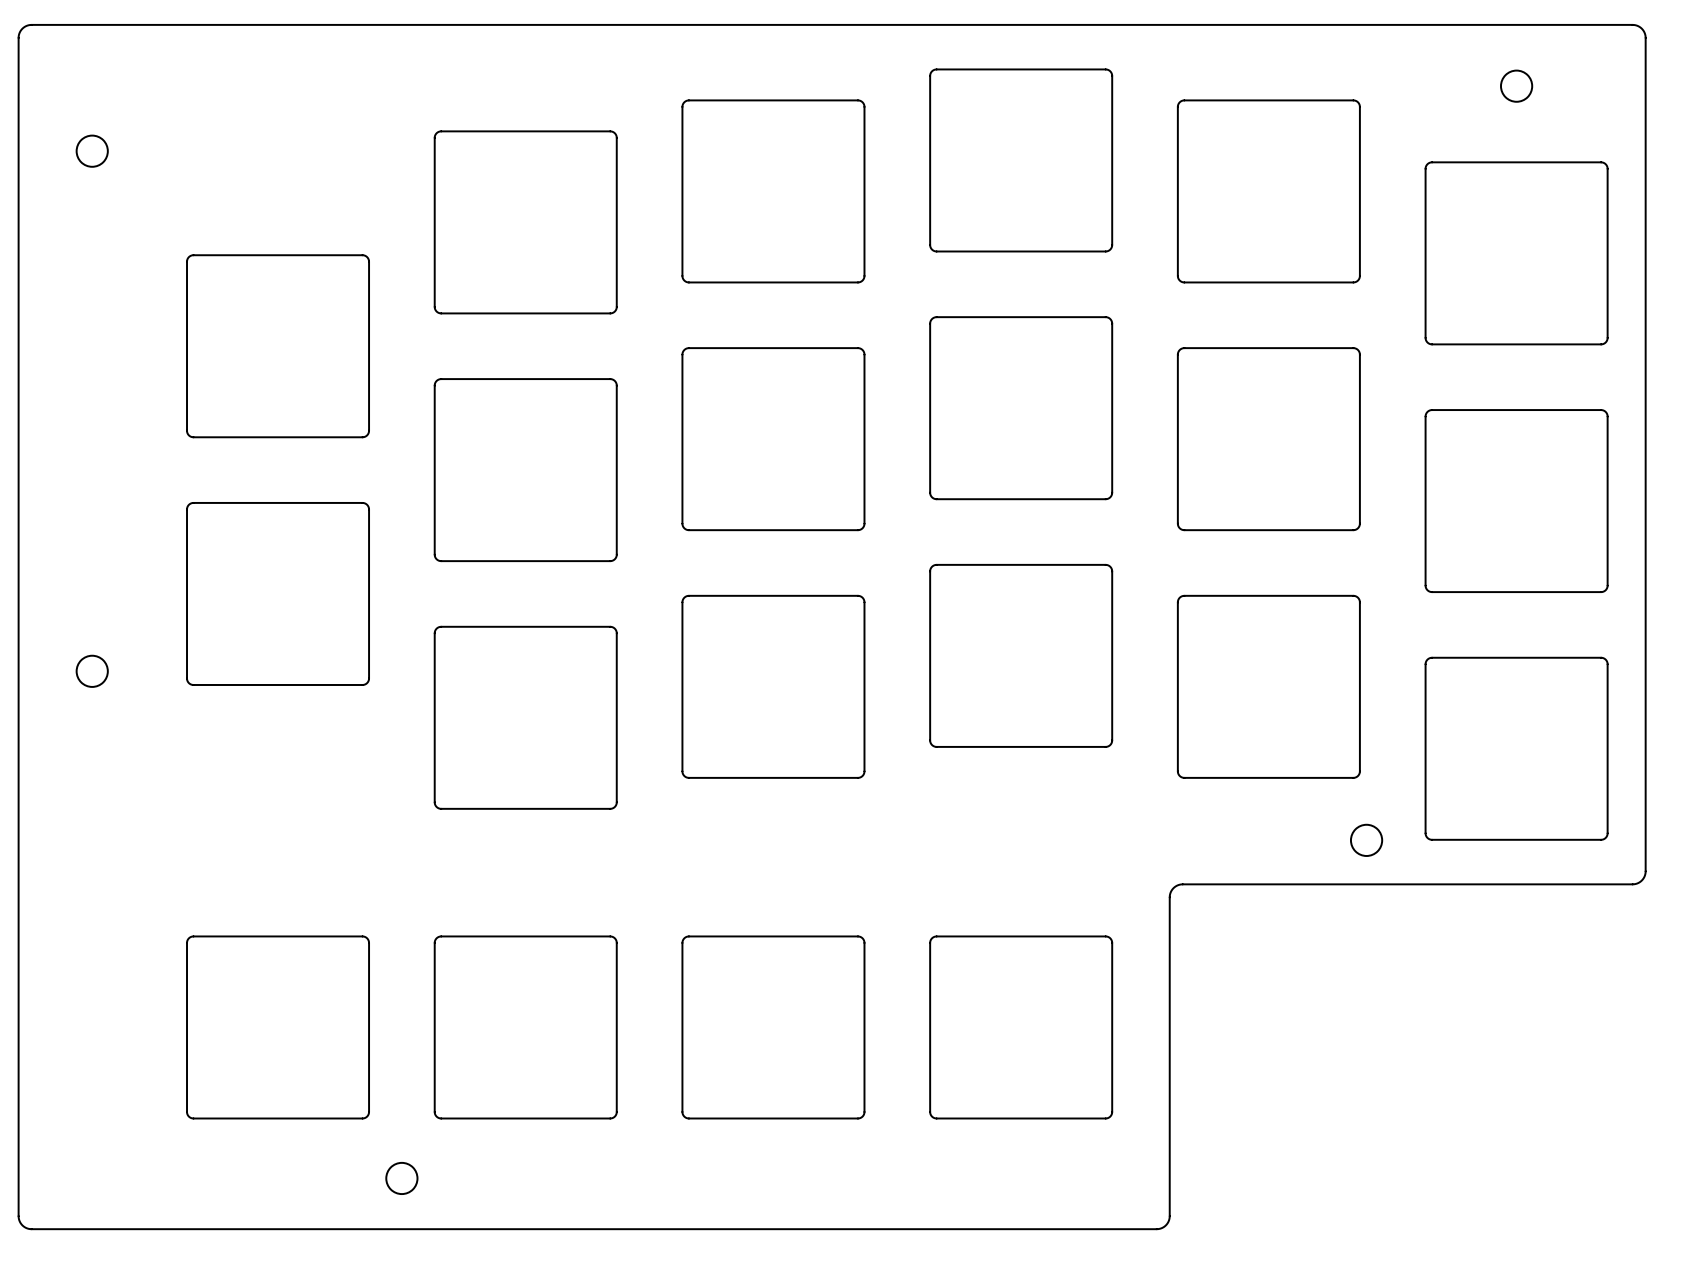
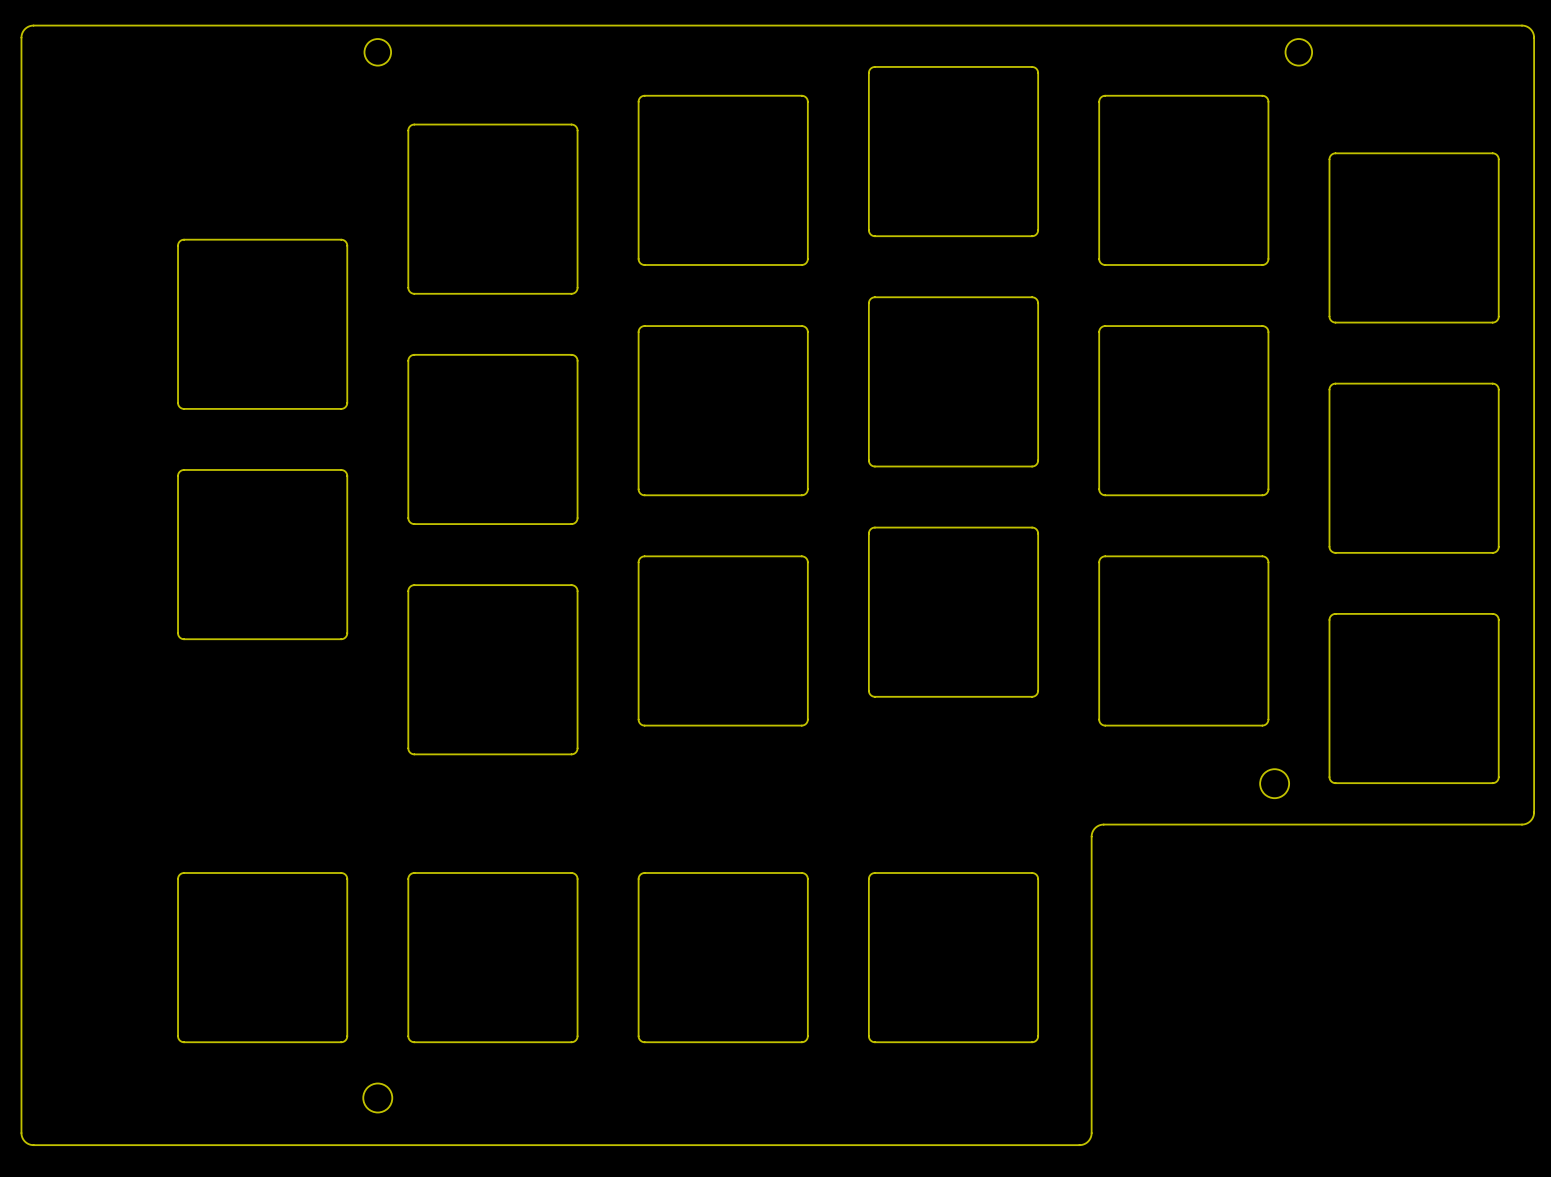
round board edge: none -> [363, 38, 392, 67]
round board edge: none -> [1284, 38, 1314, 67]
round board edge: [1500, 69, 1534, 103] -> none
round board edge: [75, 134, 109, 168] -> none
round board edge: [75, 654, 109, 688] -> none

